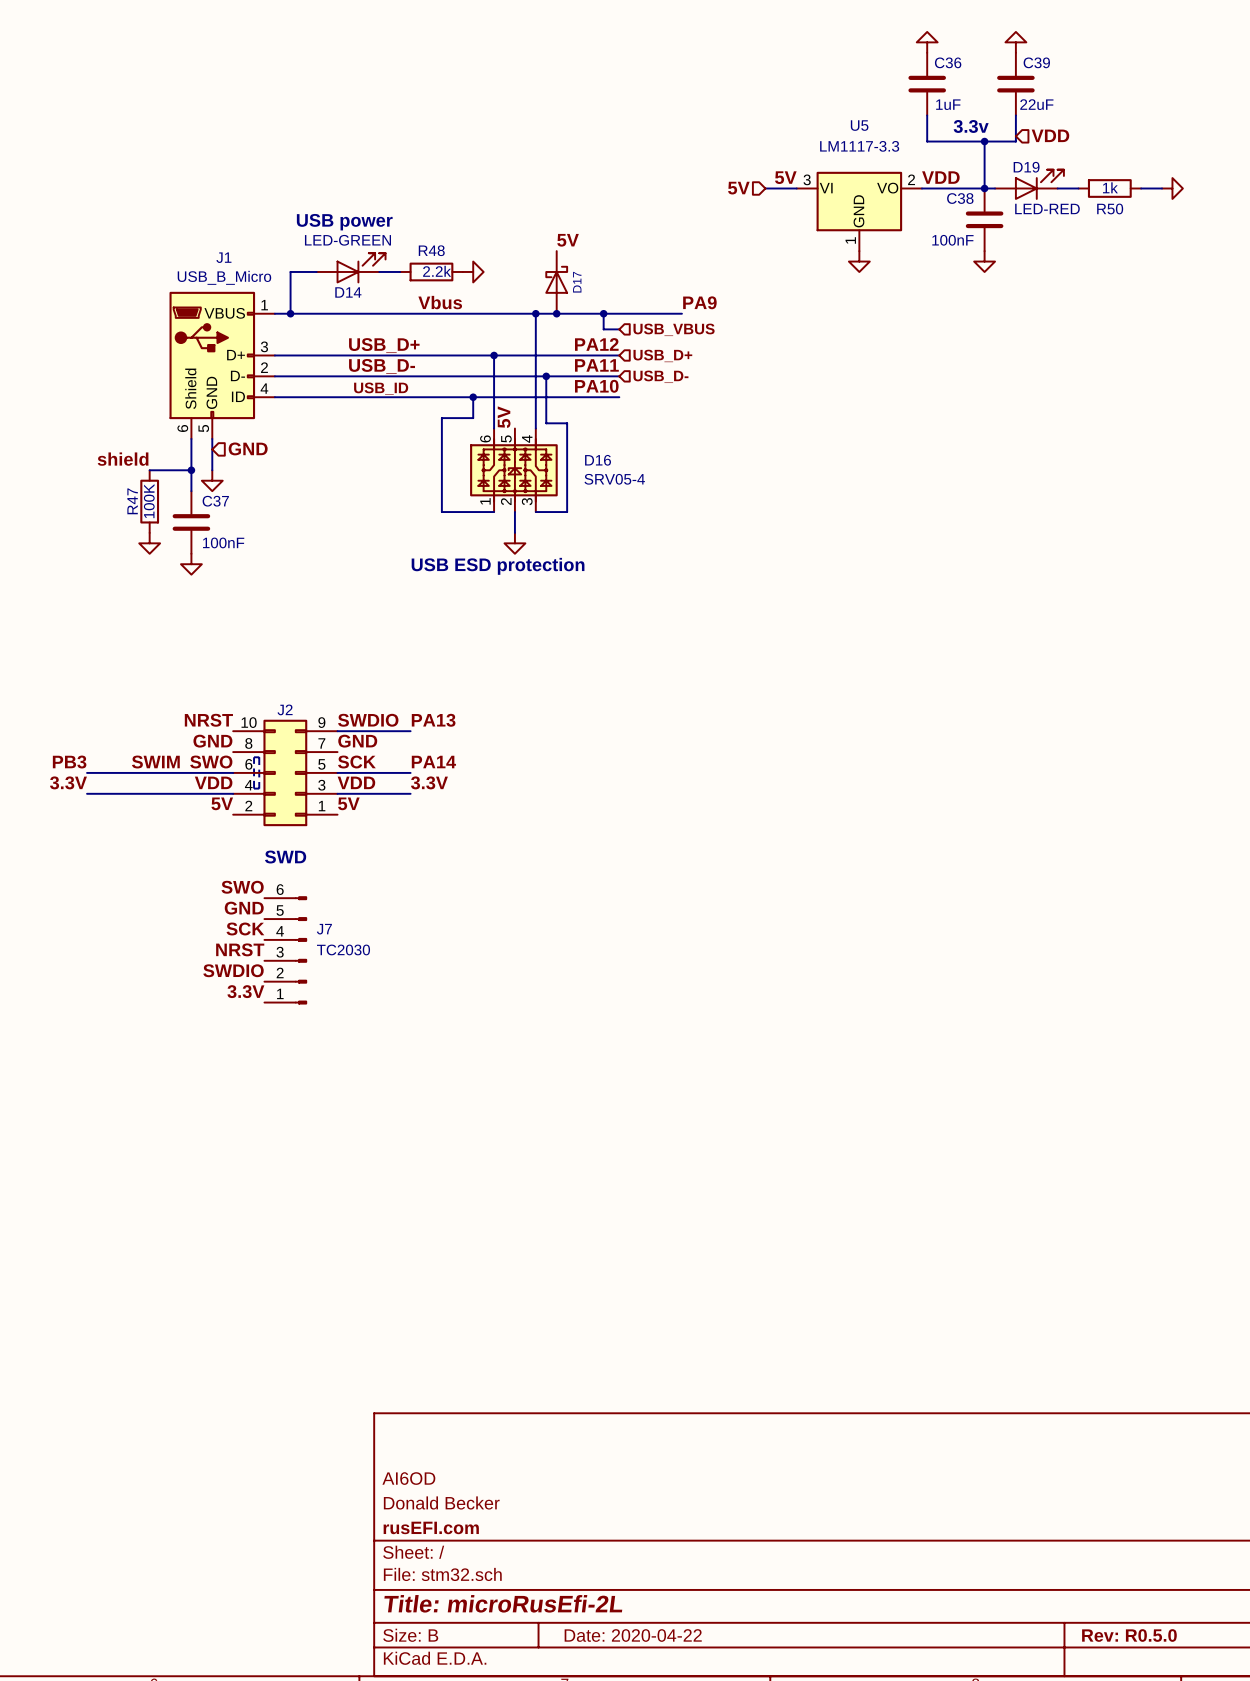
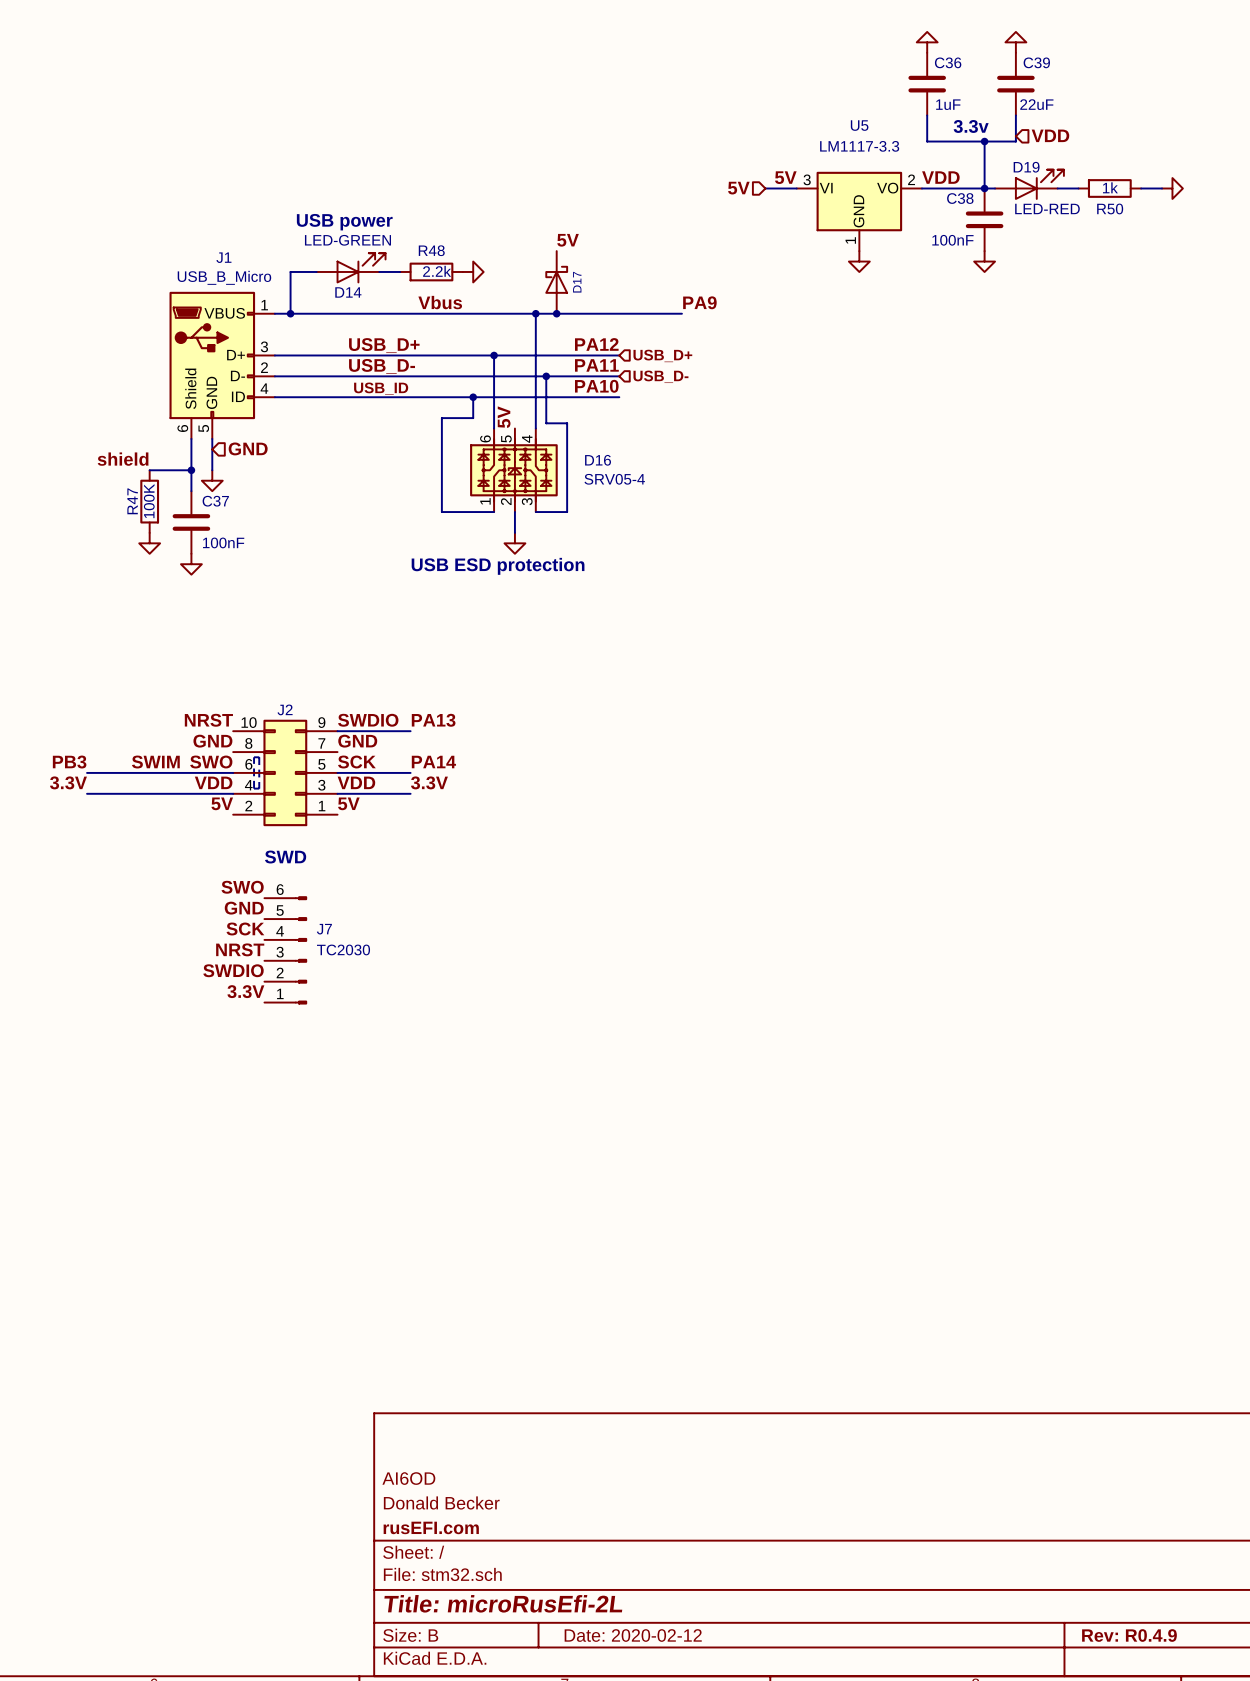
wire: (603, 313) (603, 329) (619, 329) -> none
junction: (603, 313) -> none
hierarchical label: USB_VBUS (674, 329) -> none
title block: Date: 2020-04-22 (633, 1635) -> Date: 2020-02-12 (633, 1635)
title block: Rev: R0.5.0 (1129, 1635) -> Rev: R0.4.9 (1129, 1635)

